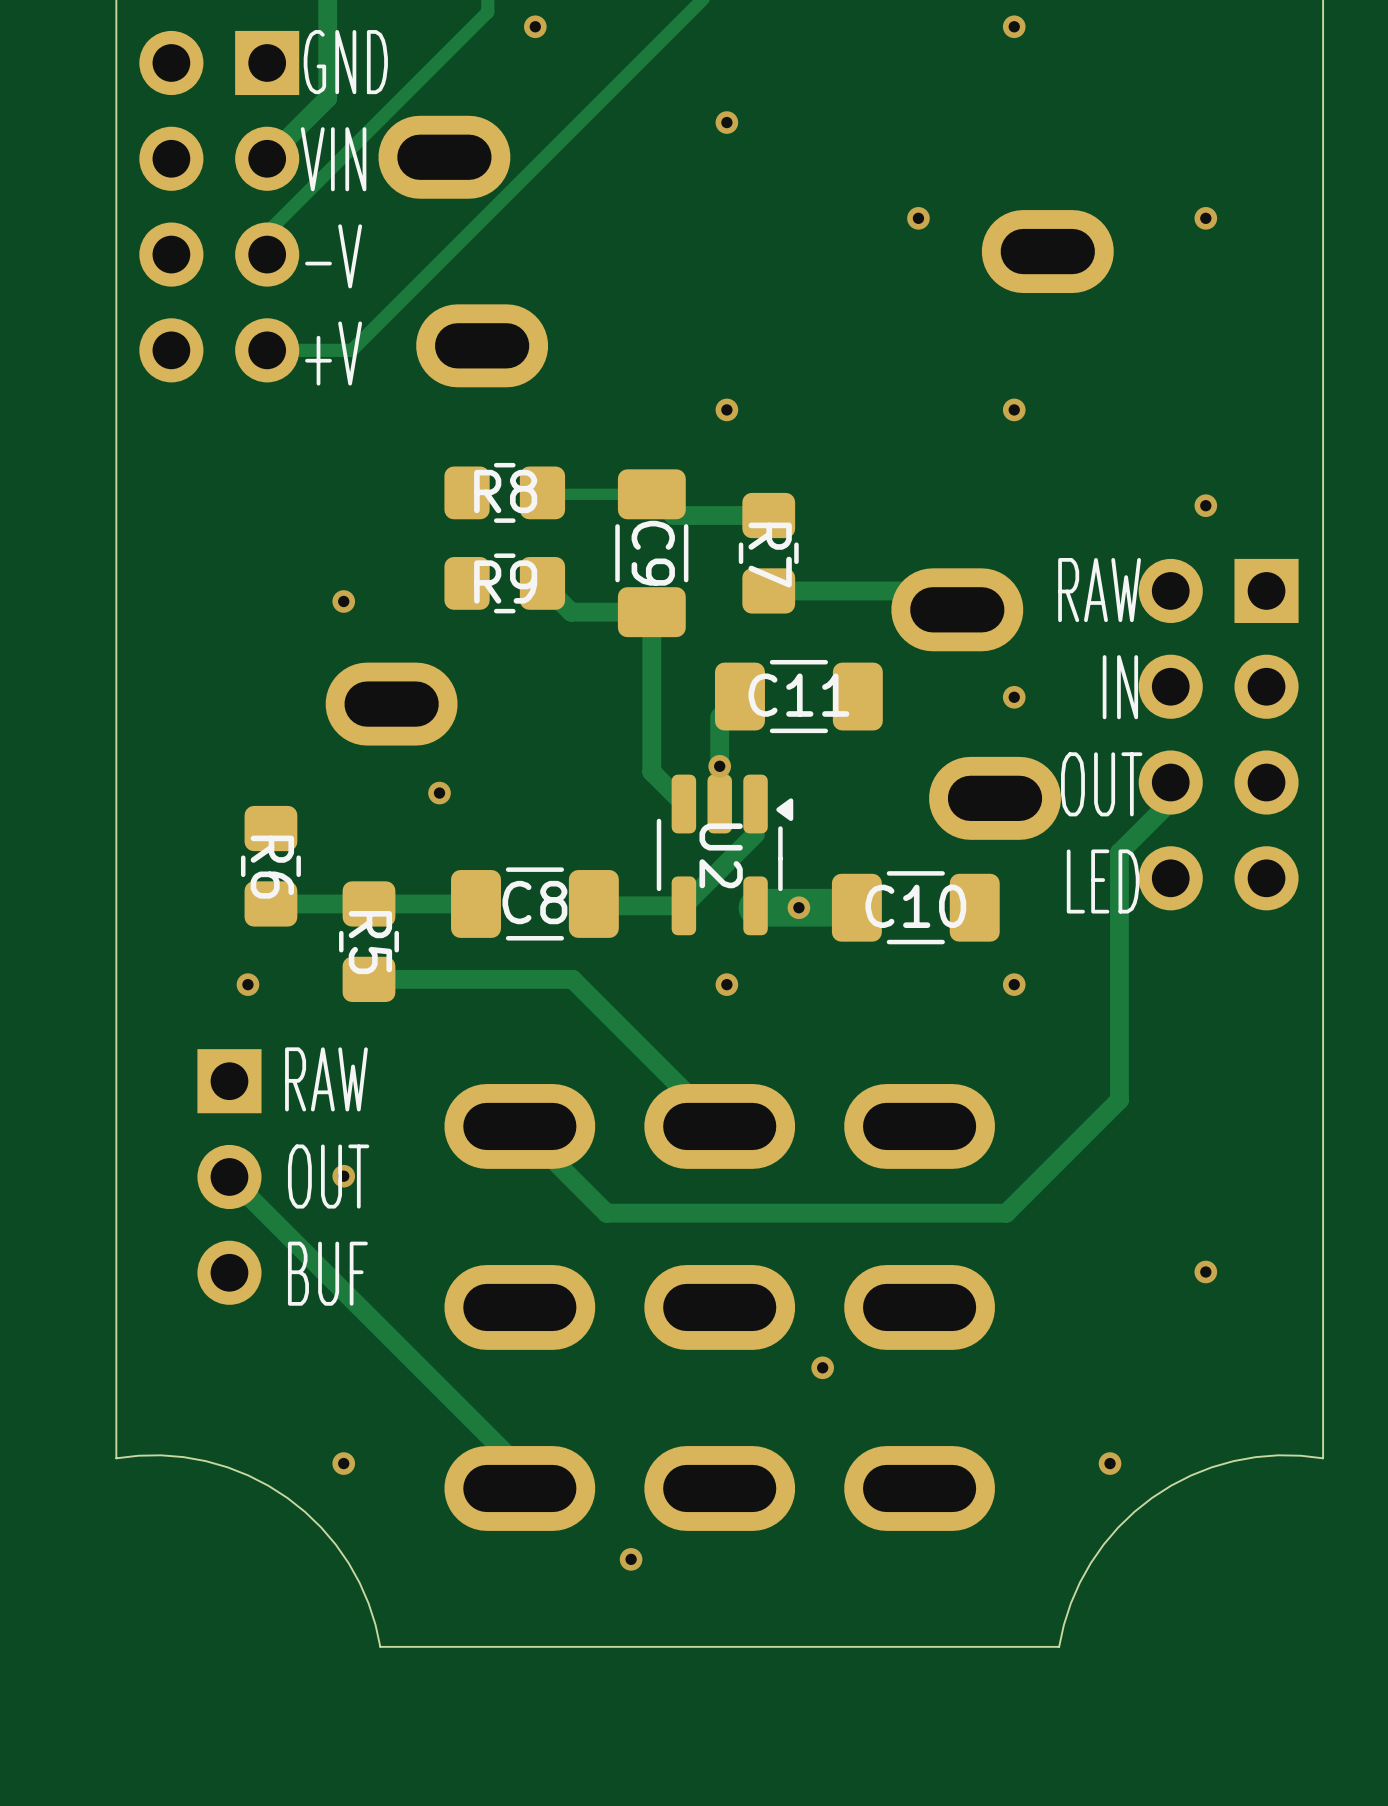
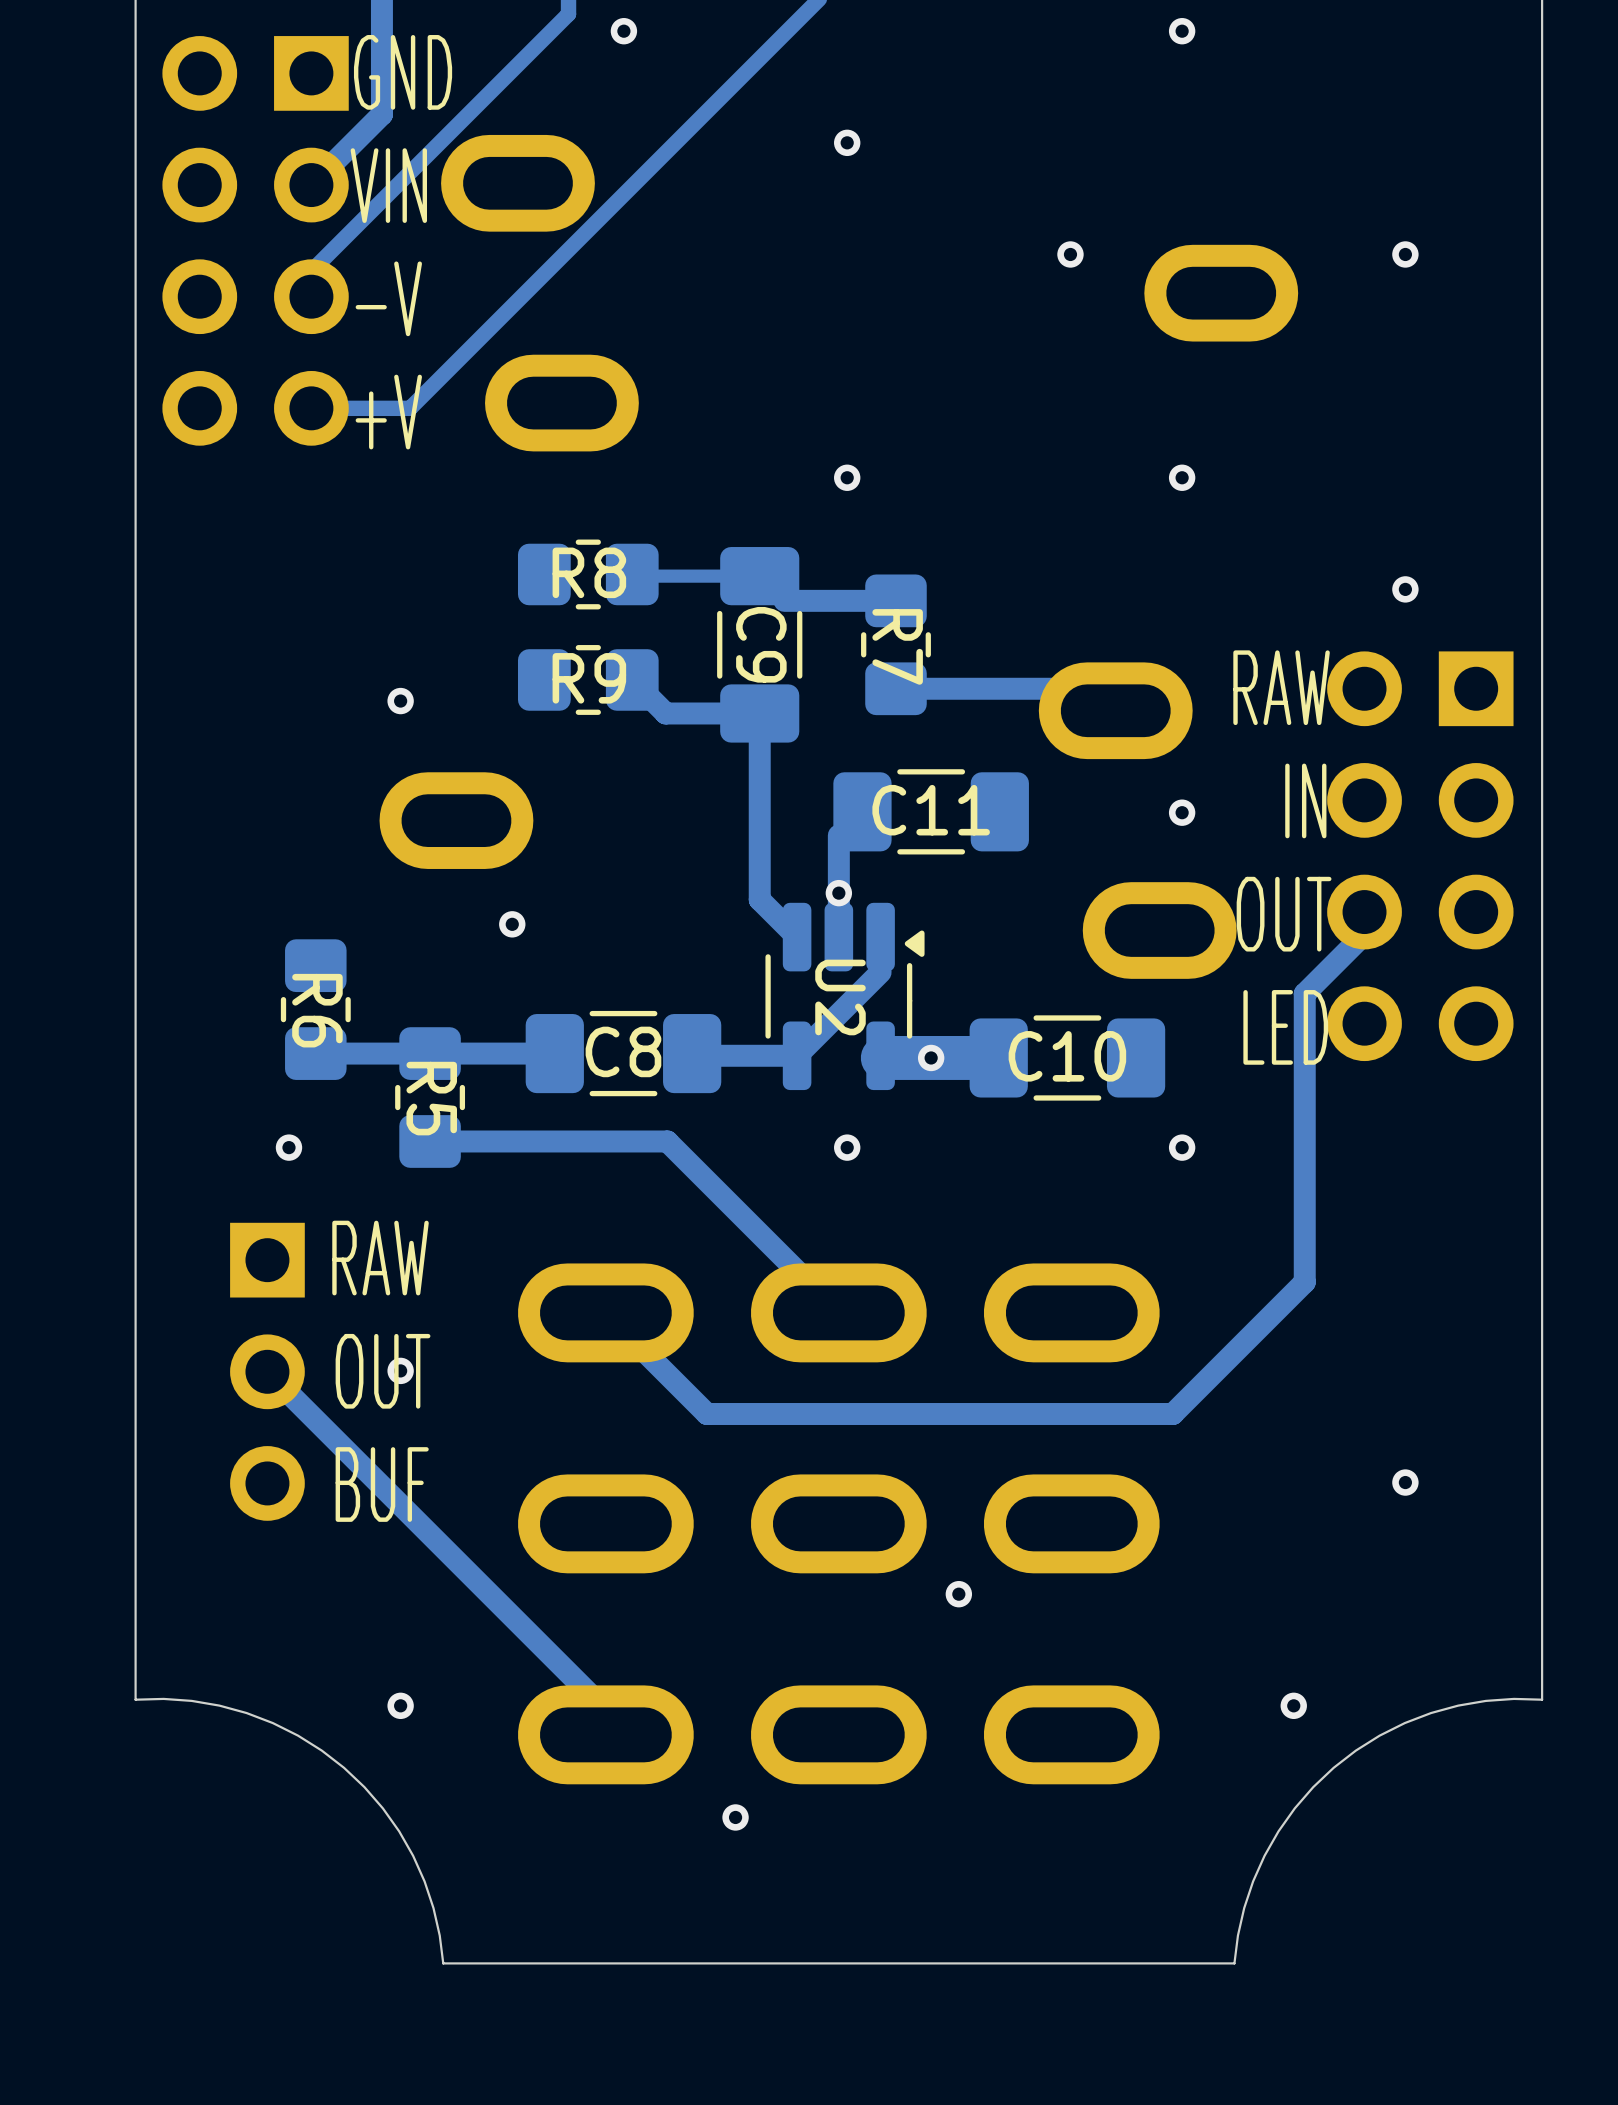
board edge: (1323, 1458) (1278, 1455) (1233, 1461) (1191, 1475) (1152, 1497) (1118, 1527) (1090, 1563) (1070, 1603) (1059, 1646) (380, 1646) (368, 1603) (348, 1563) (321, 1527) (287, 1497) (248, 1475) (205, 1461) (161, 1455) (116, 1458) -> (1542, 1699) (1485, 1700) (1431, 1713) (1379, 1735) (1333, 1767) (1294, 1808) (1264, 1855) (1244, 1908) (1234, 1963) (443, 1963) (433, 1908) (413, 1855) (382, 1808) (344, 1767) (298, 1735) (246, 1713) (191, 1700) (135, 1699)

